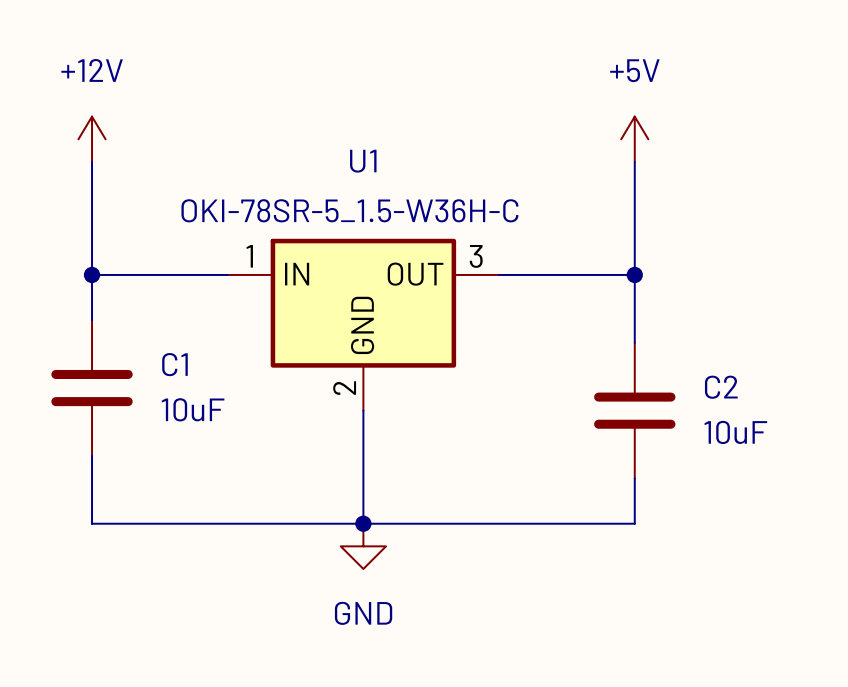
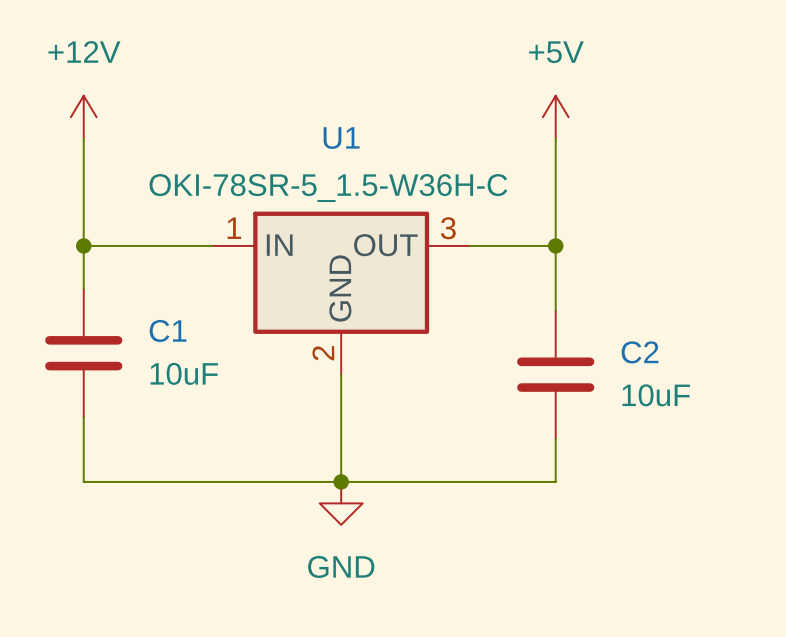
power symbol position: +5V (634, 139) -> +5V (555, 117)
wire: (634, 161) (634, 342) -> (555, 138) (555, 310)
wire: (589, 274) (634, 274) -> none
junction position: (634, 274) -> (555, 245)
C2 position: (634, 410) -> (555, 374)
wire: (634, 478) (634, 523) (589, 523) -> (555, 439) (555, 481)

